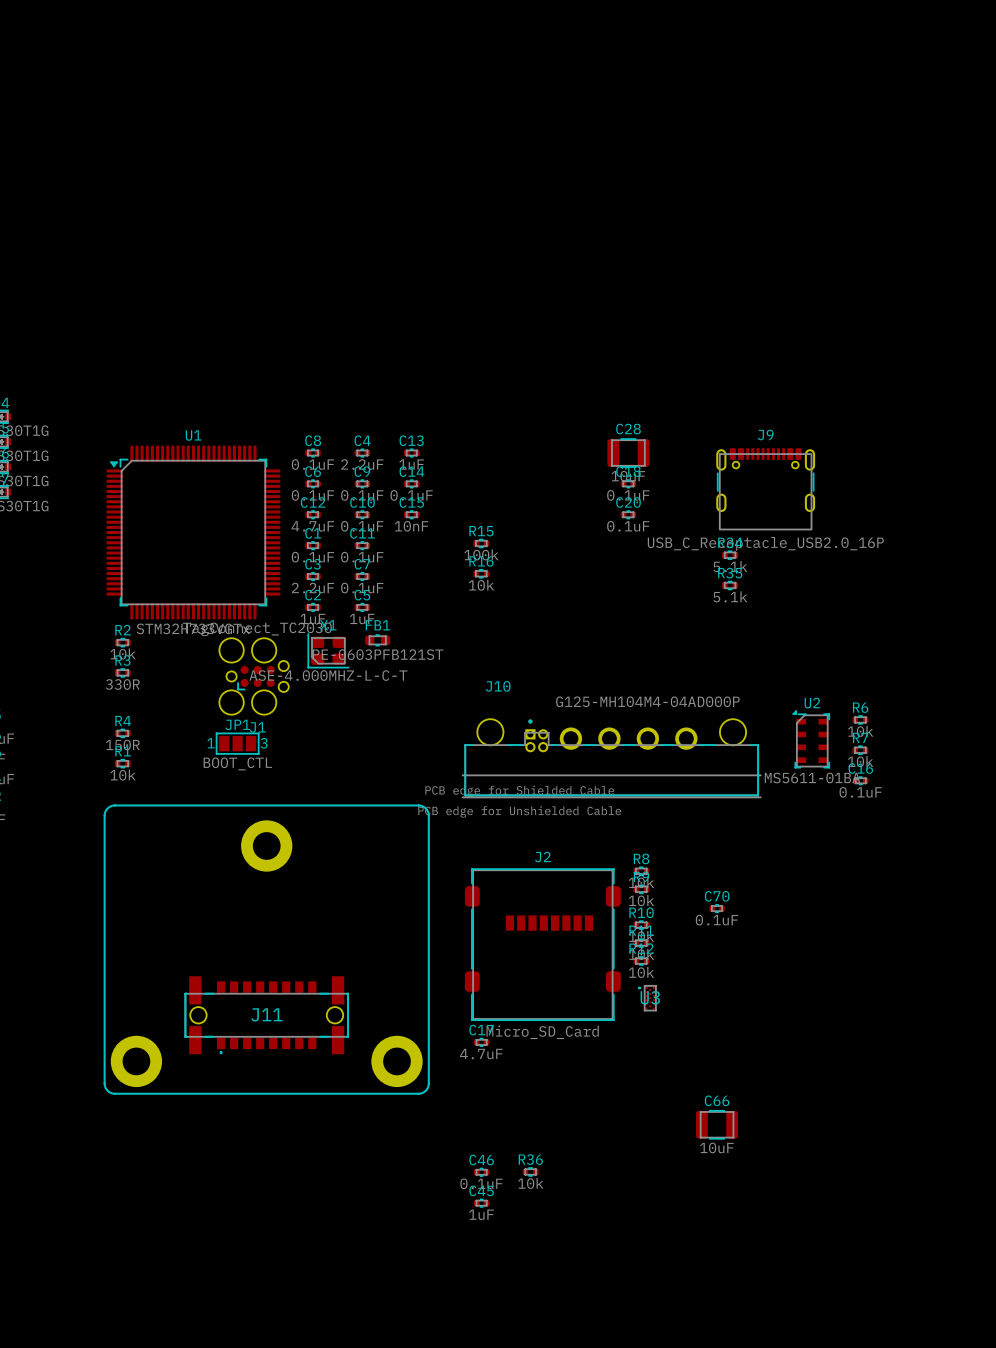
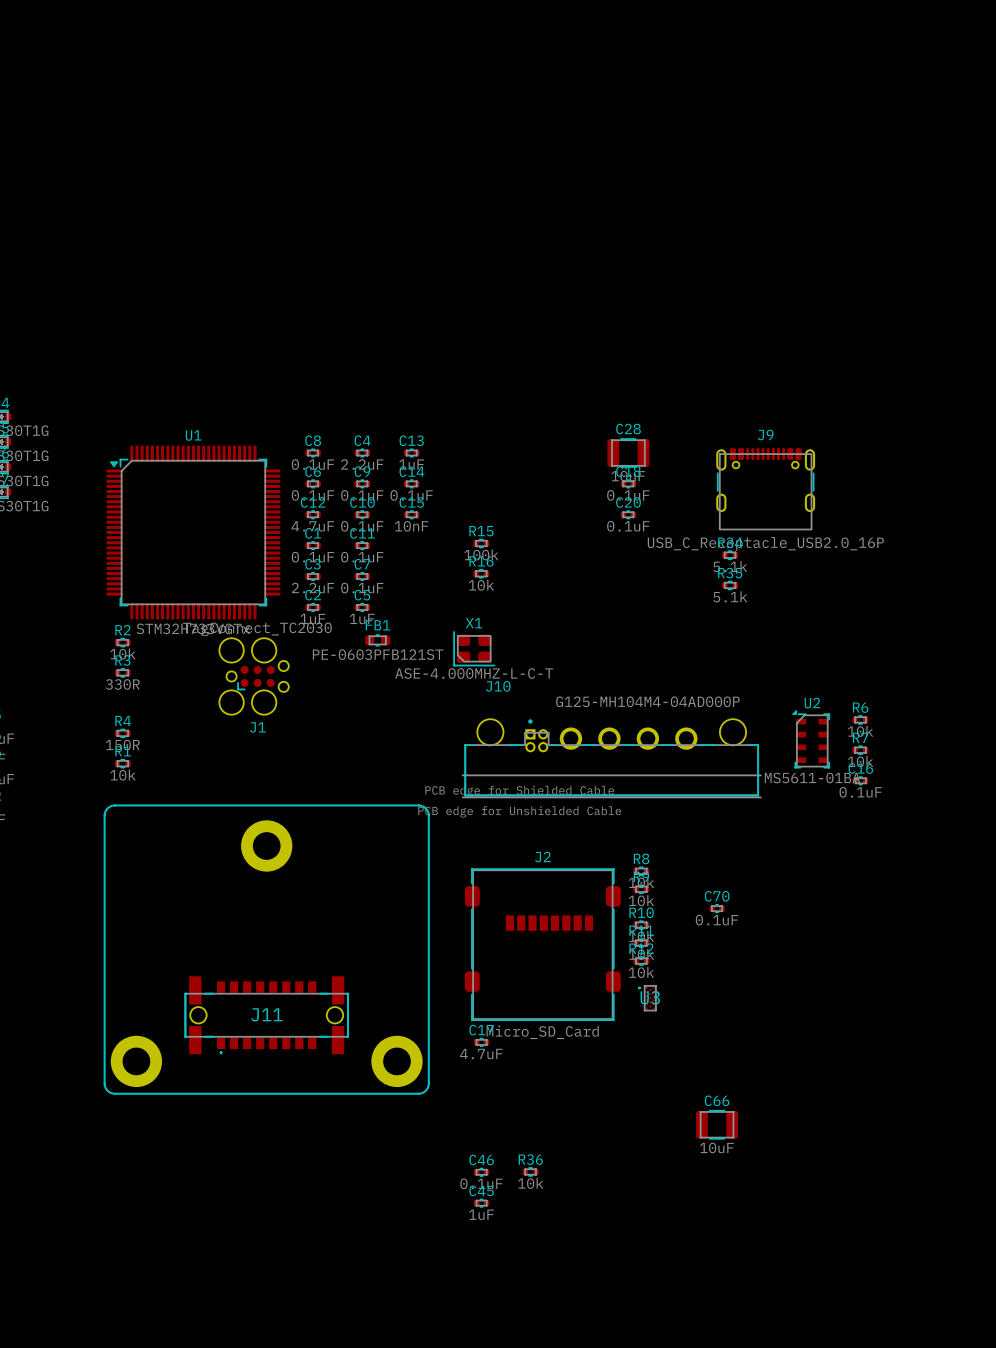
X1 position: (328, 650) -> (474, 648)
JP1: BOOT_CTL (237, 743) -> none

